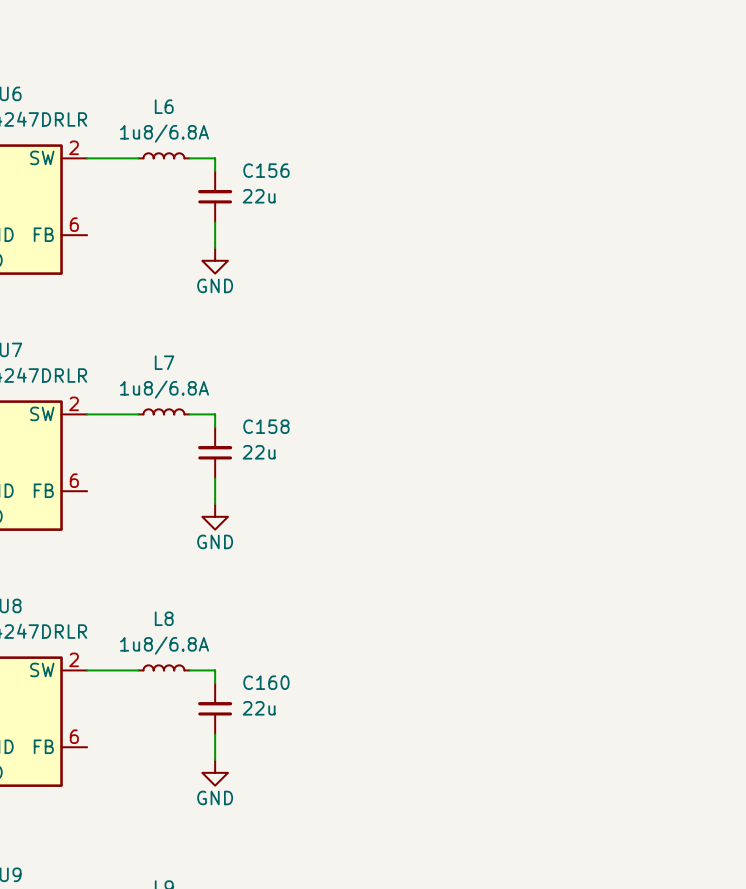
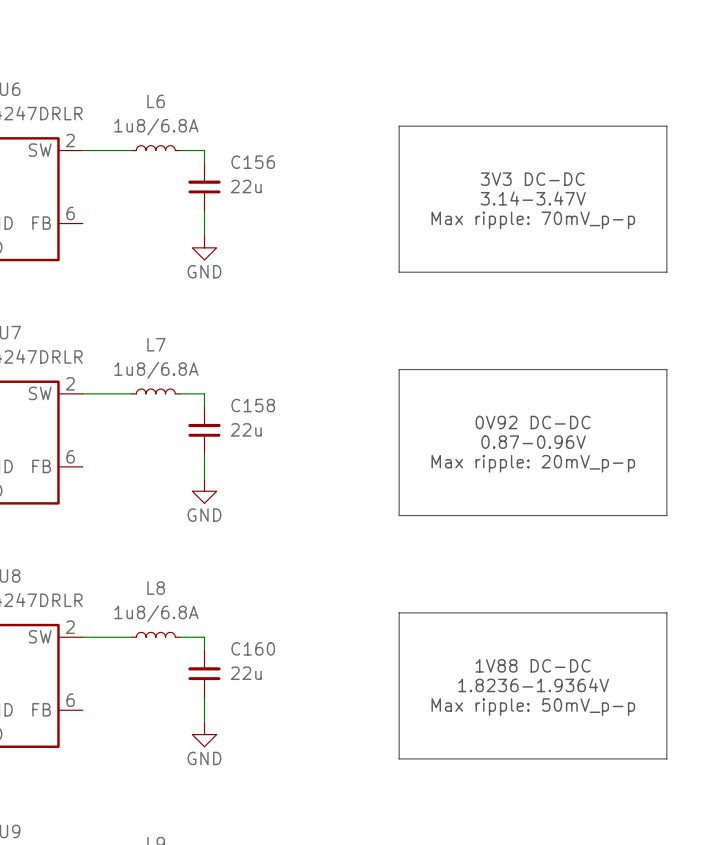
line: none -> (399, 126) (399, 272) (666, 272) (666, 126) (399, 126)
text: none -> 3V3 DC-DC (532, 179)
text: none -> 3.14-3.47V (533, 198)
text: none -> Max ripple: 70mV_p-p (533, 220)
line: none -> (399, 369) (399, 515) (666, 515) (666, 369) (399, 369)
text: none -> 0V92 DC-DC (533, 422)
text: none -> 0.87-0.96V (533, 442)
text: none -> Max ripple: 20mV_p-p (533, 463)
line: none -> (399, 612) (666, 612) (666, 758) (399, 758) (399, 612)
text: none -> 1V88 DC-DC (533, 665)
text: none -> 1.8236-1.9364V (533, 685)
text: none -> Max ripple: 50mV_p-p (533, 707)

